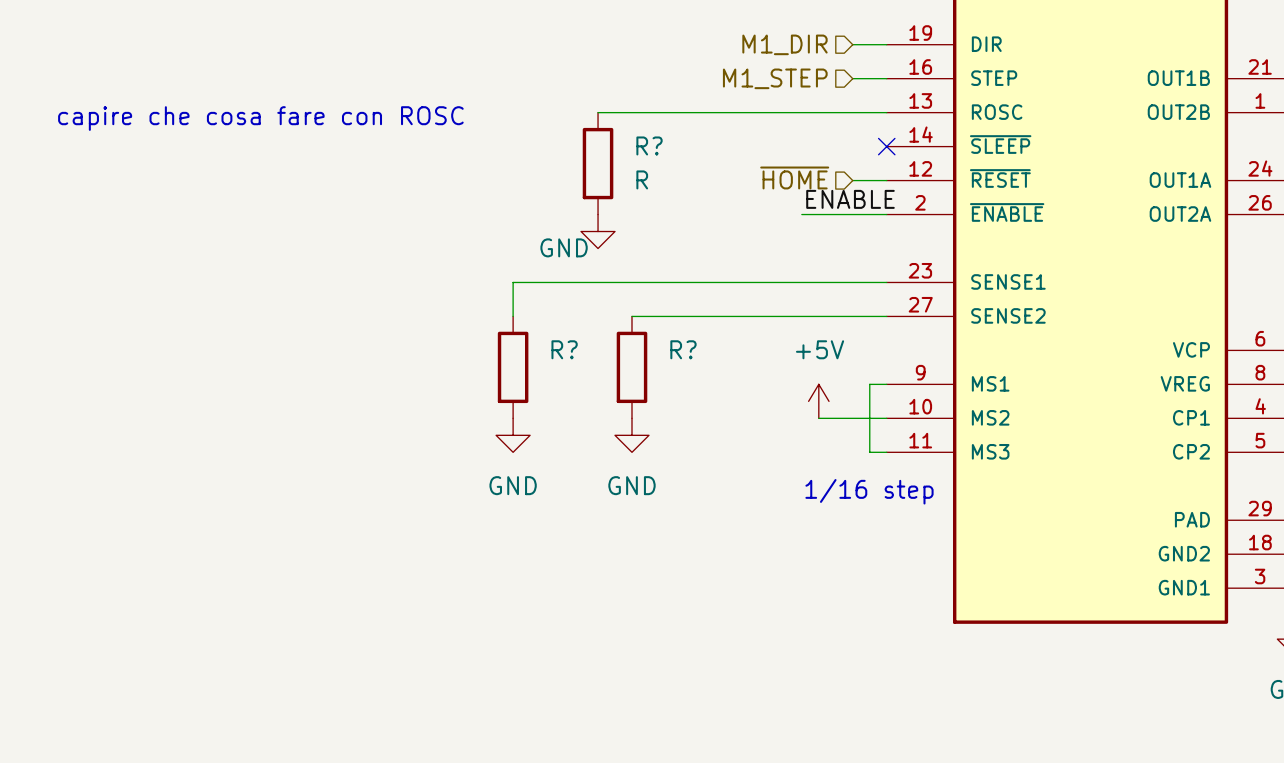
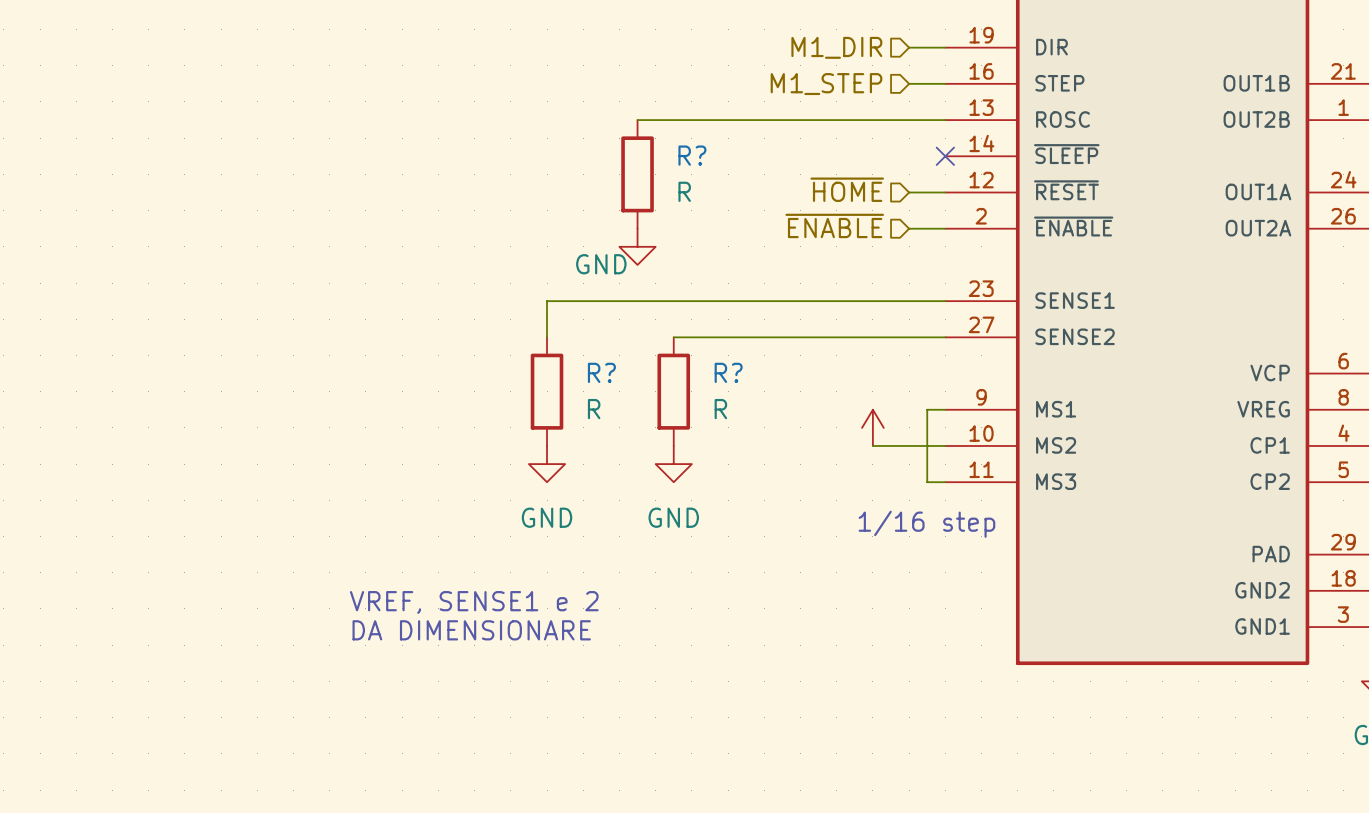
text: capire che cosa fare con ROSC (260, 118) -> none
label: ENABLE (850, 199) -> none
hierarchical label: none -> ~{ENABLE} (834, 225)
wire: (801, 214) (852, 214) -> none
power symbol text: +5V (820, 349) -> none
R? value: none -> R (594, 409)
R? value: none -> R (720, 409)
text: none -> VREF, SENSE1 e 2 (474, 602)
text: none -> DA DIMENSIONARE (471, 630)

